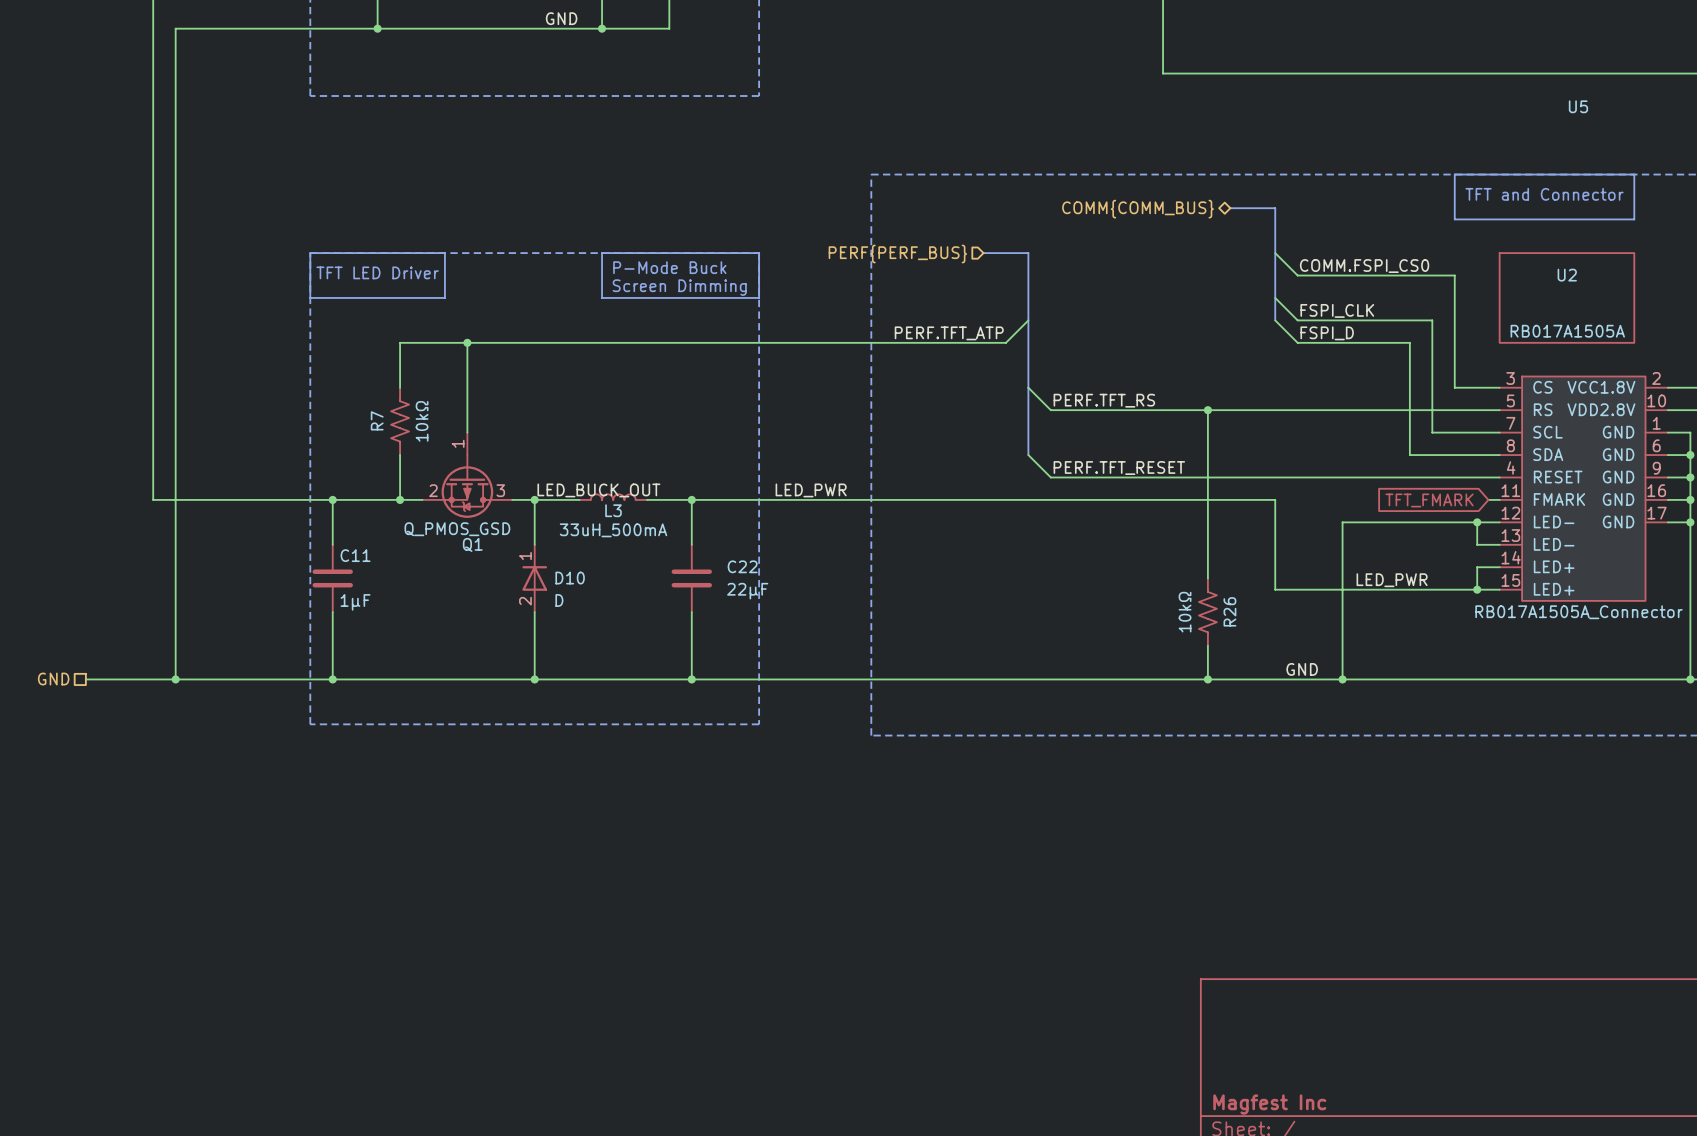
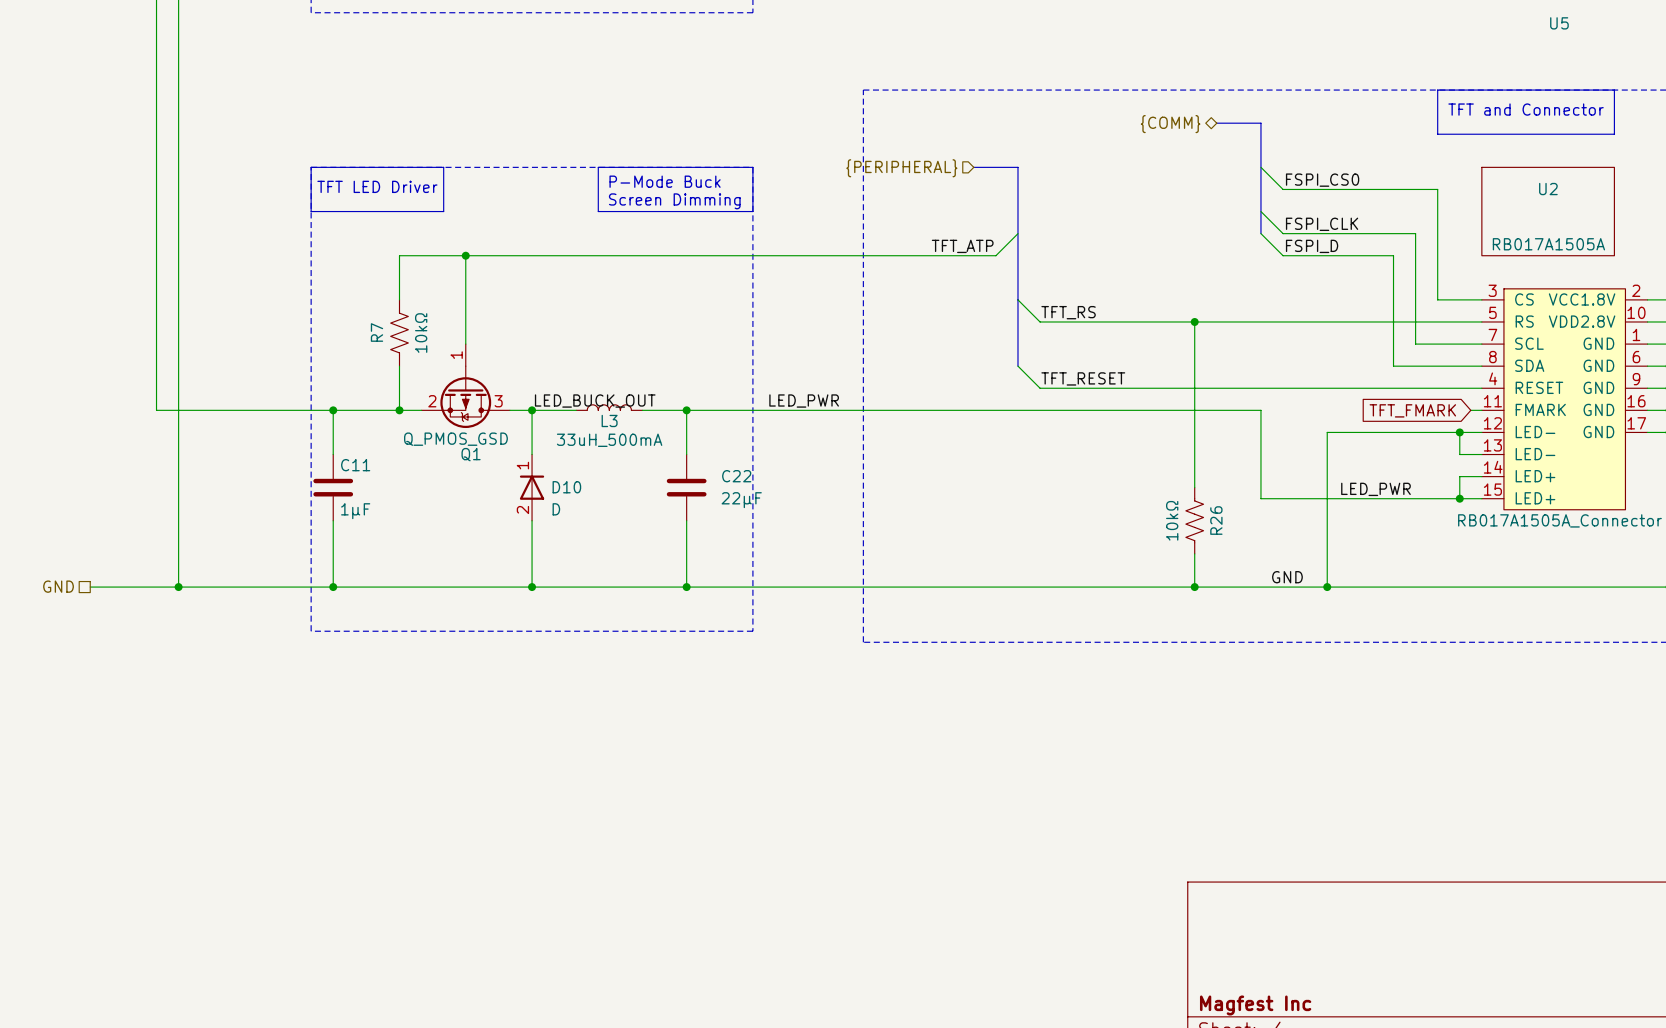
hierarchical label: COMM{COMM_BUS} (1138, 209) -> {COMM} (1170, 124)
hierarchical label: PERF{PERF_BUS} (897, 254) -> {PERIPHERAL} (901, 168)
label: COMM.FSPI_CS0 (1364, 266) -> FSPI_CS0 (1322, 180)
label: PERF.TFT_ATP (949, 333) -> TFT_ATP (962, 246)
label: PERF.TFT_RS (1104, 400) -> TFT_RS (1068, 312)
label: PERF.TFT_RESET (1119, 468) -> TFT_RESET (1083, 378)

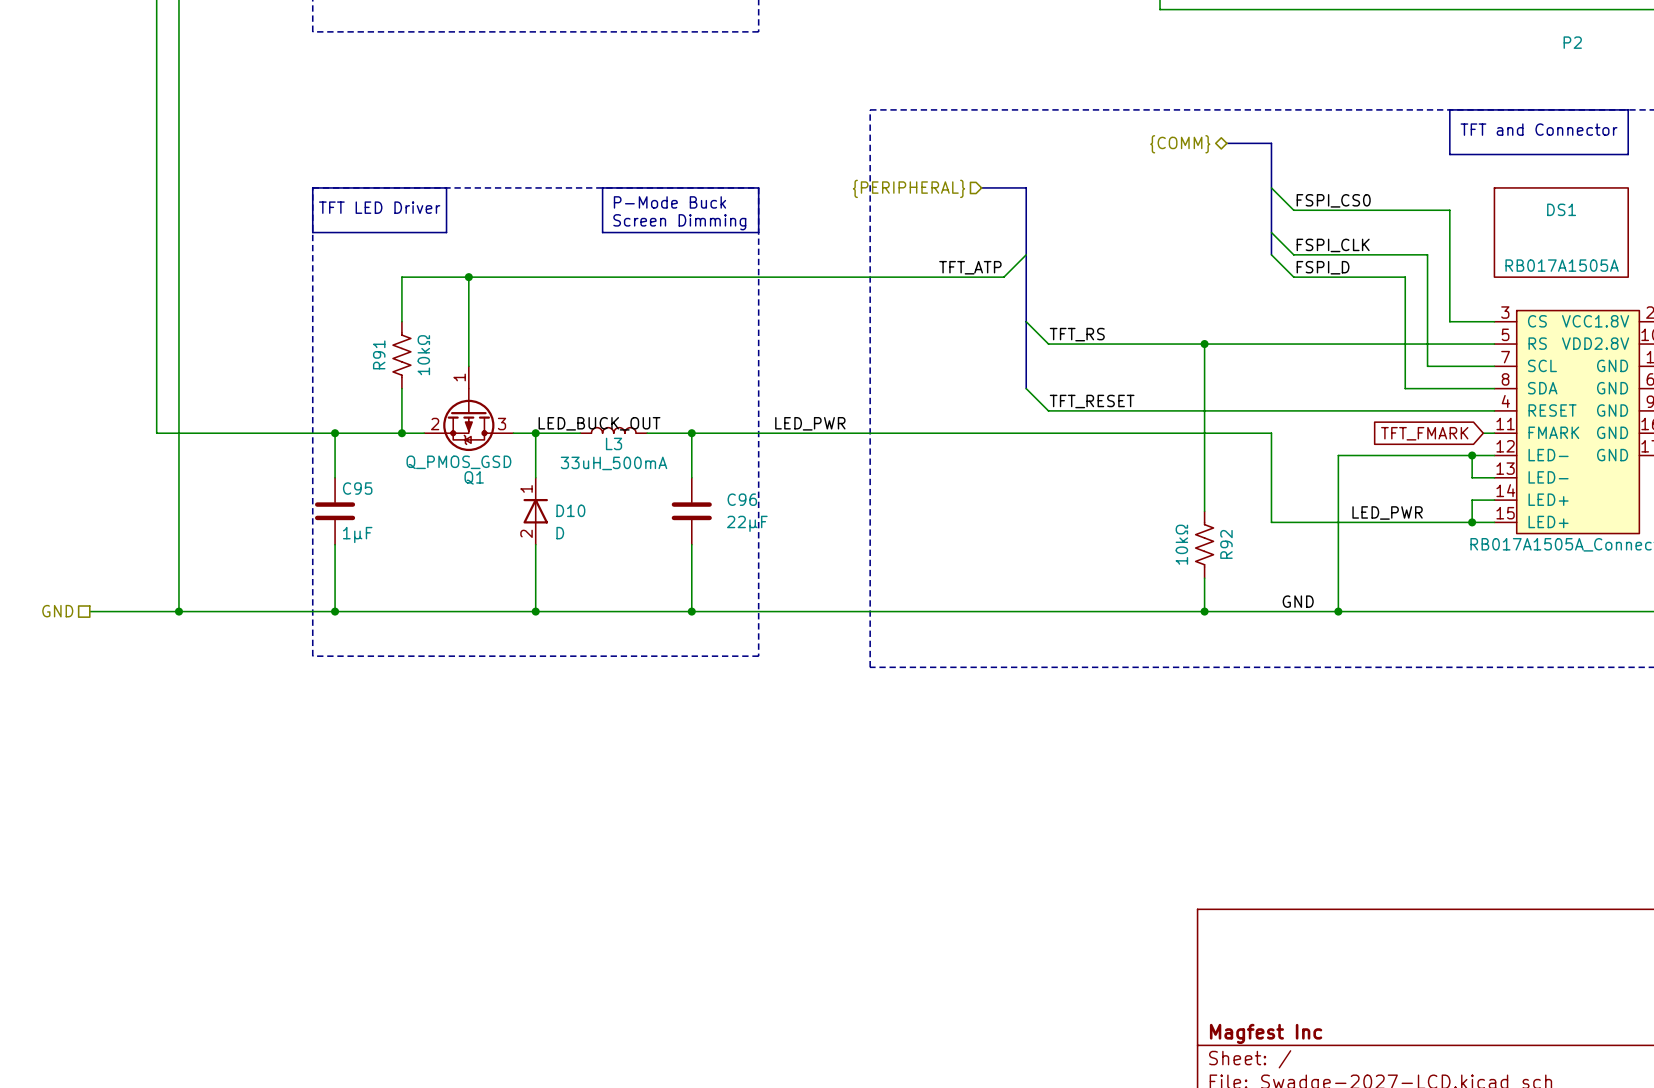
U5 name: U5 (1559, 23) -> P2 (1572, 42)
U2 name: U2 (1548, 189) -> DS1 (1561, 209)
R7 name: R7 (376, 332) -> R91 (379, 354)
C11 name: C11 (355, 465) -> C95 (357, 488)
C22 name: C22 (736, 476) -> C96 (742, 499)
R26 name: R26 (1216, 520) -> R92 (1226, 544)

